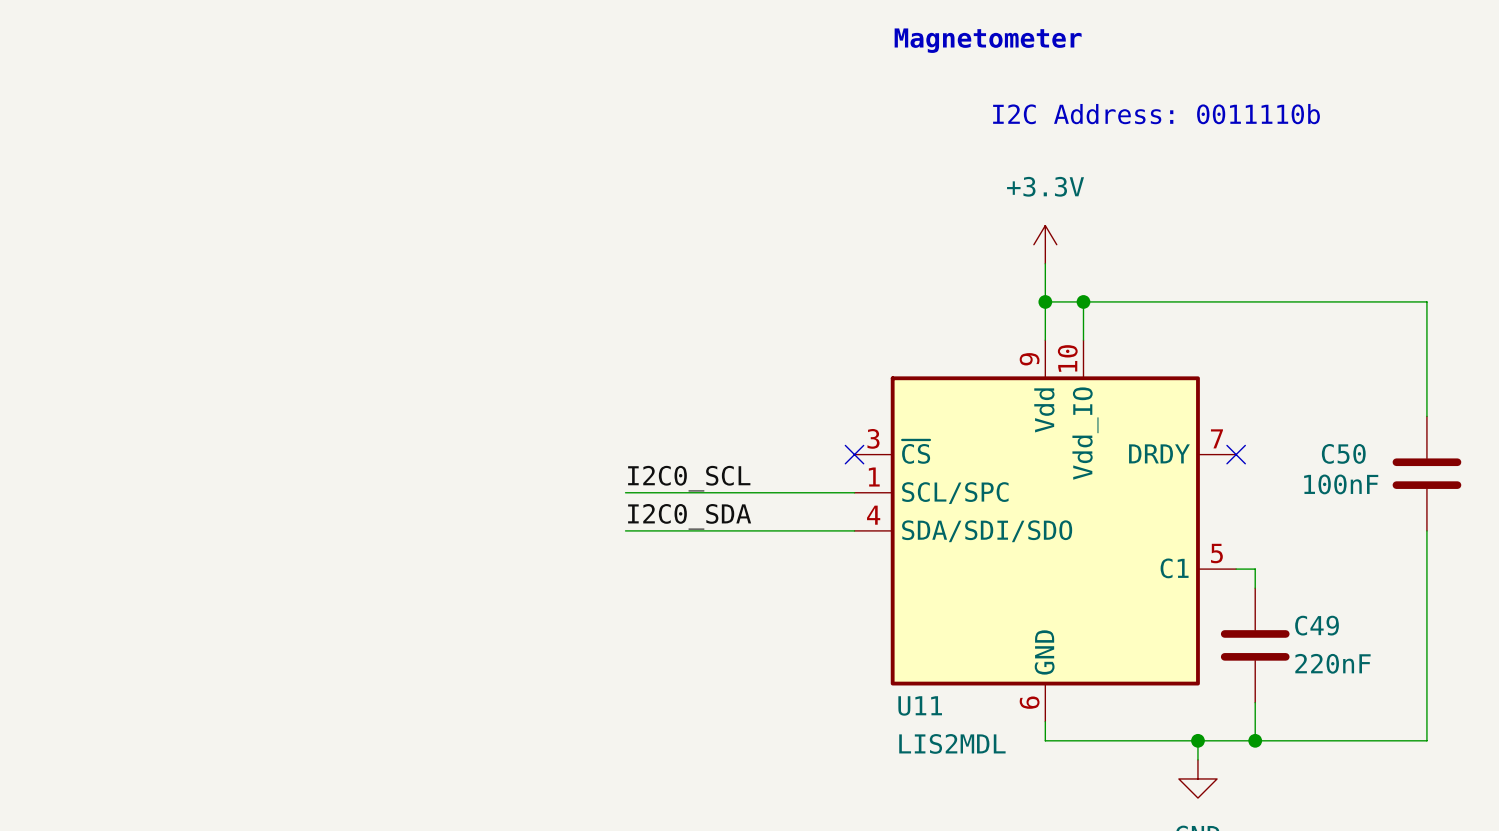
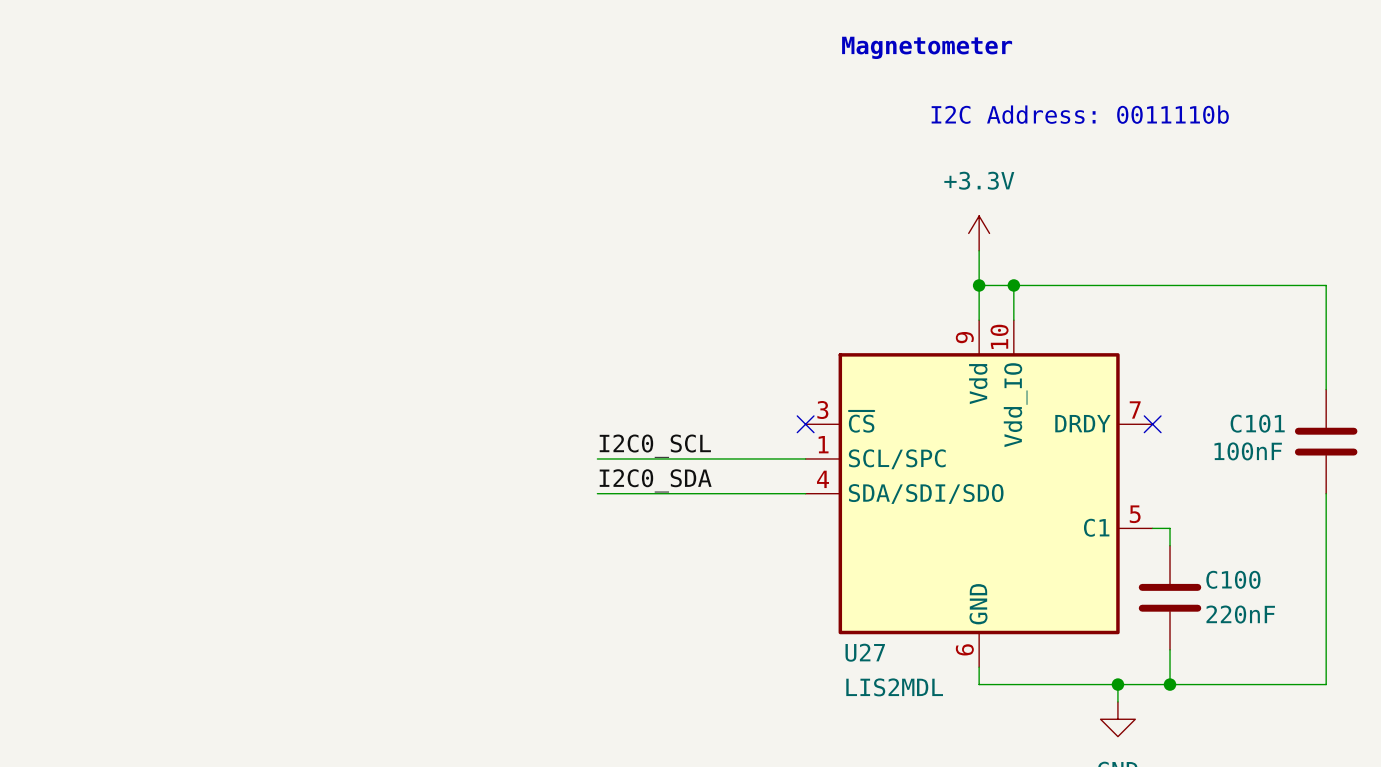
C50 name: C50 (1343, 453) -> C101 (1257, 423)
C49 name: C49 (1317, 625) -> C100 (1233, 579)
U11 name: U11 (920, 705) -> U27 (865, 652)

